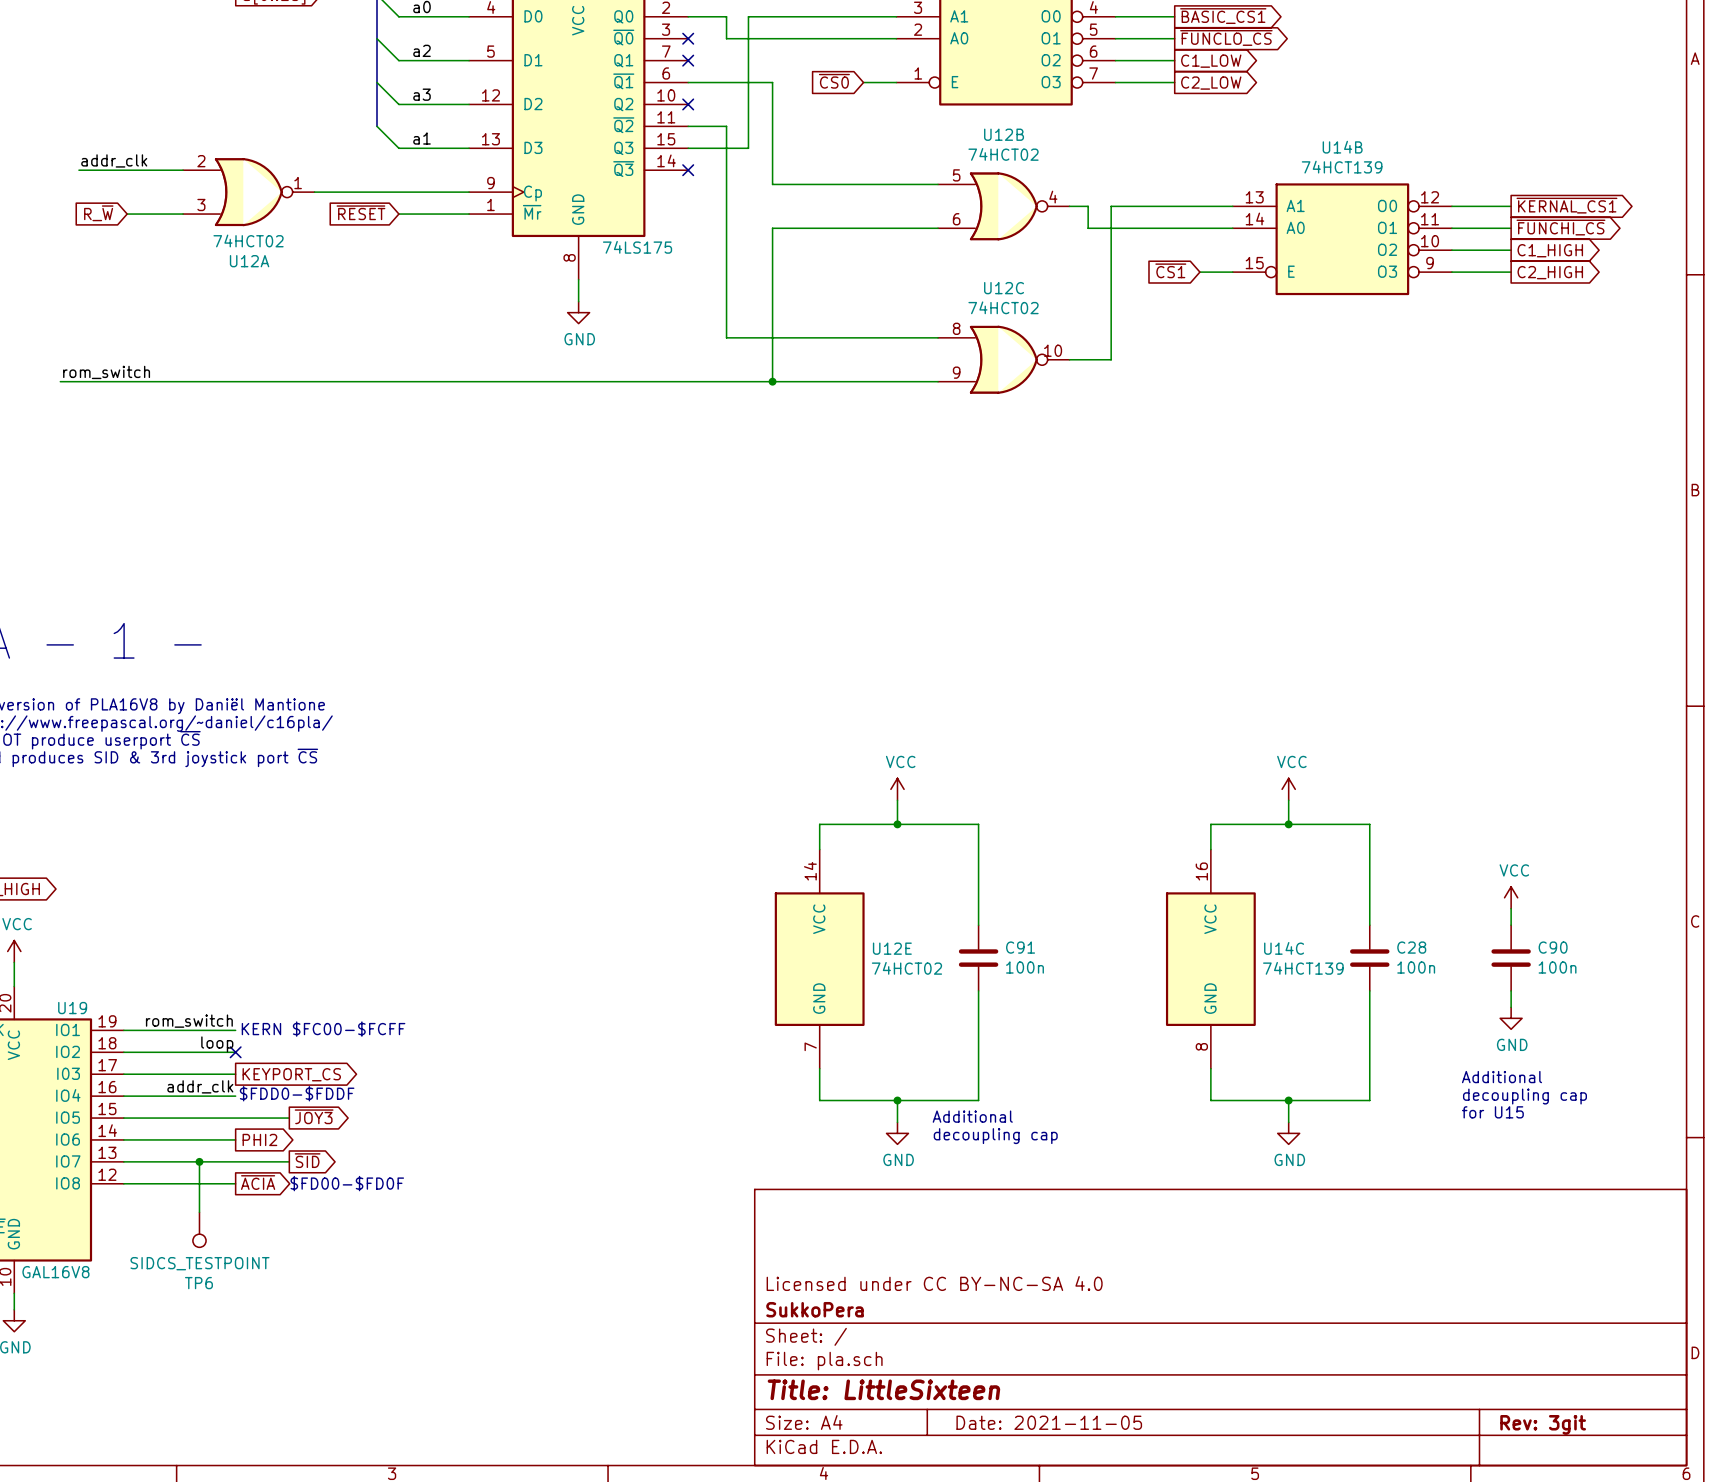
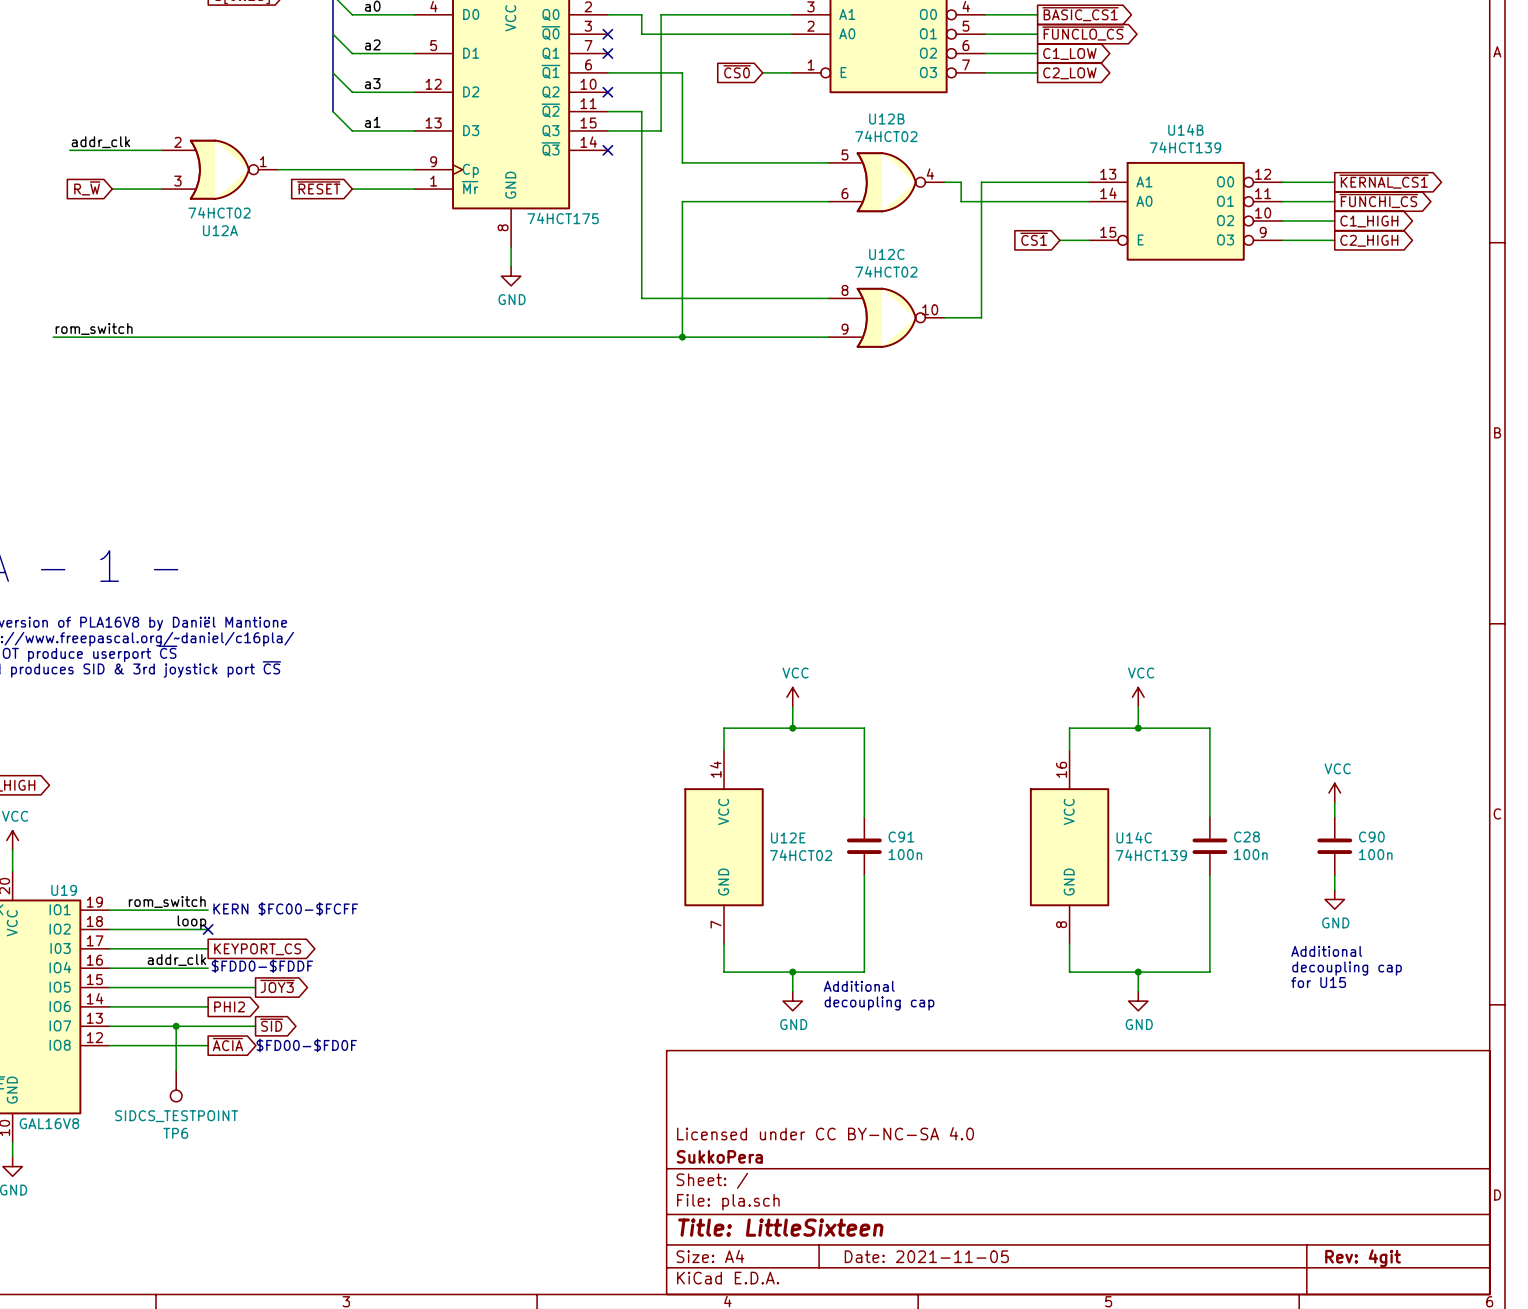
part value: 74LS175 (637, 247) -> 74HCT175 (563, 218)
title block: Rev: 3git (1543, 1424) -> Rev: 4git (1363, 1258)

